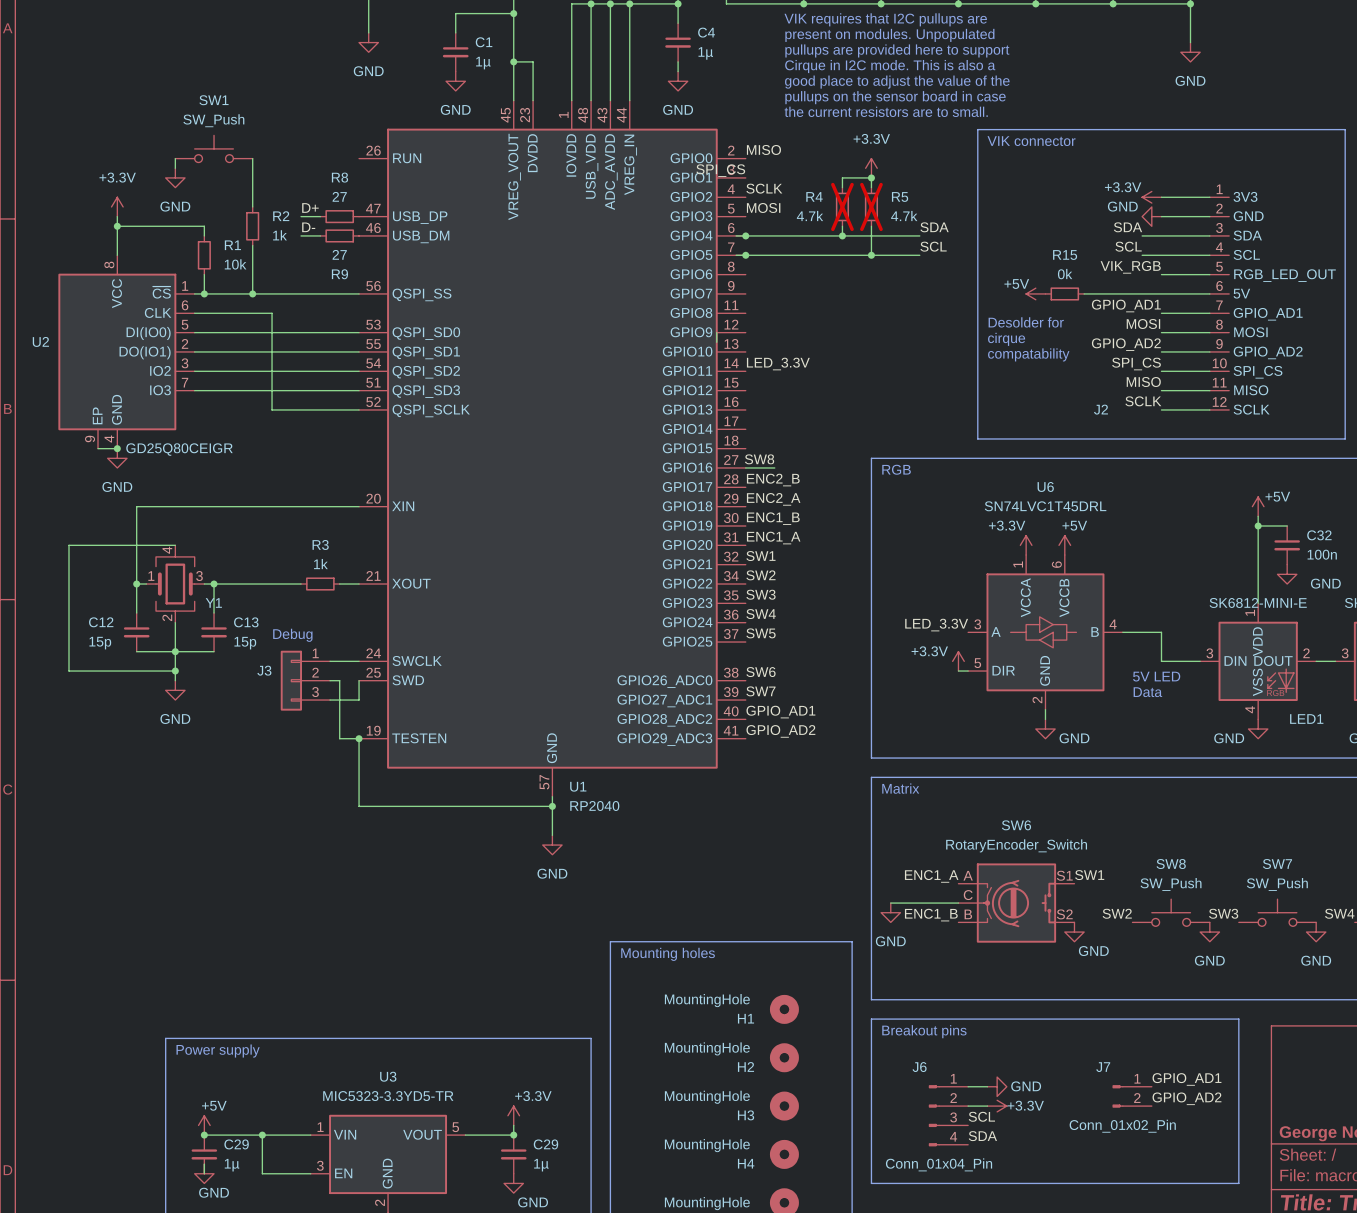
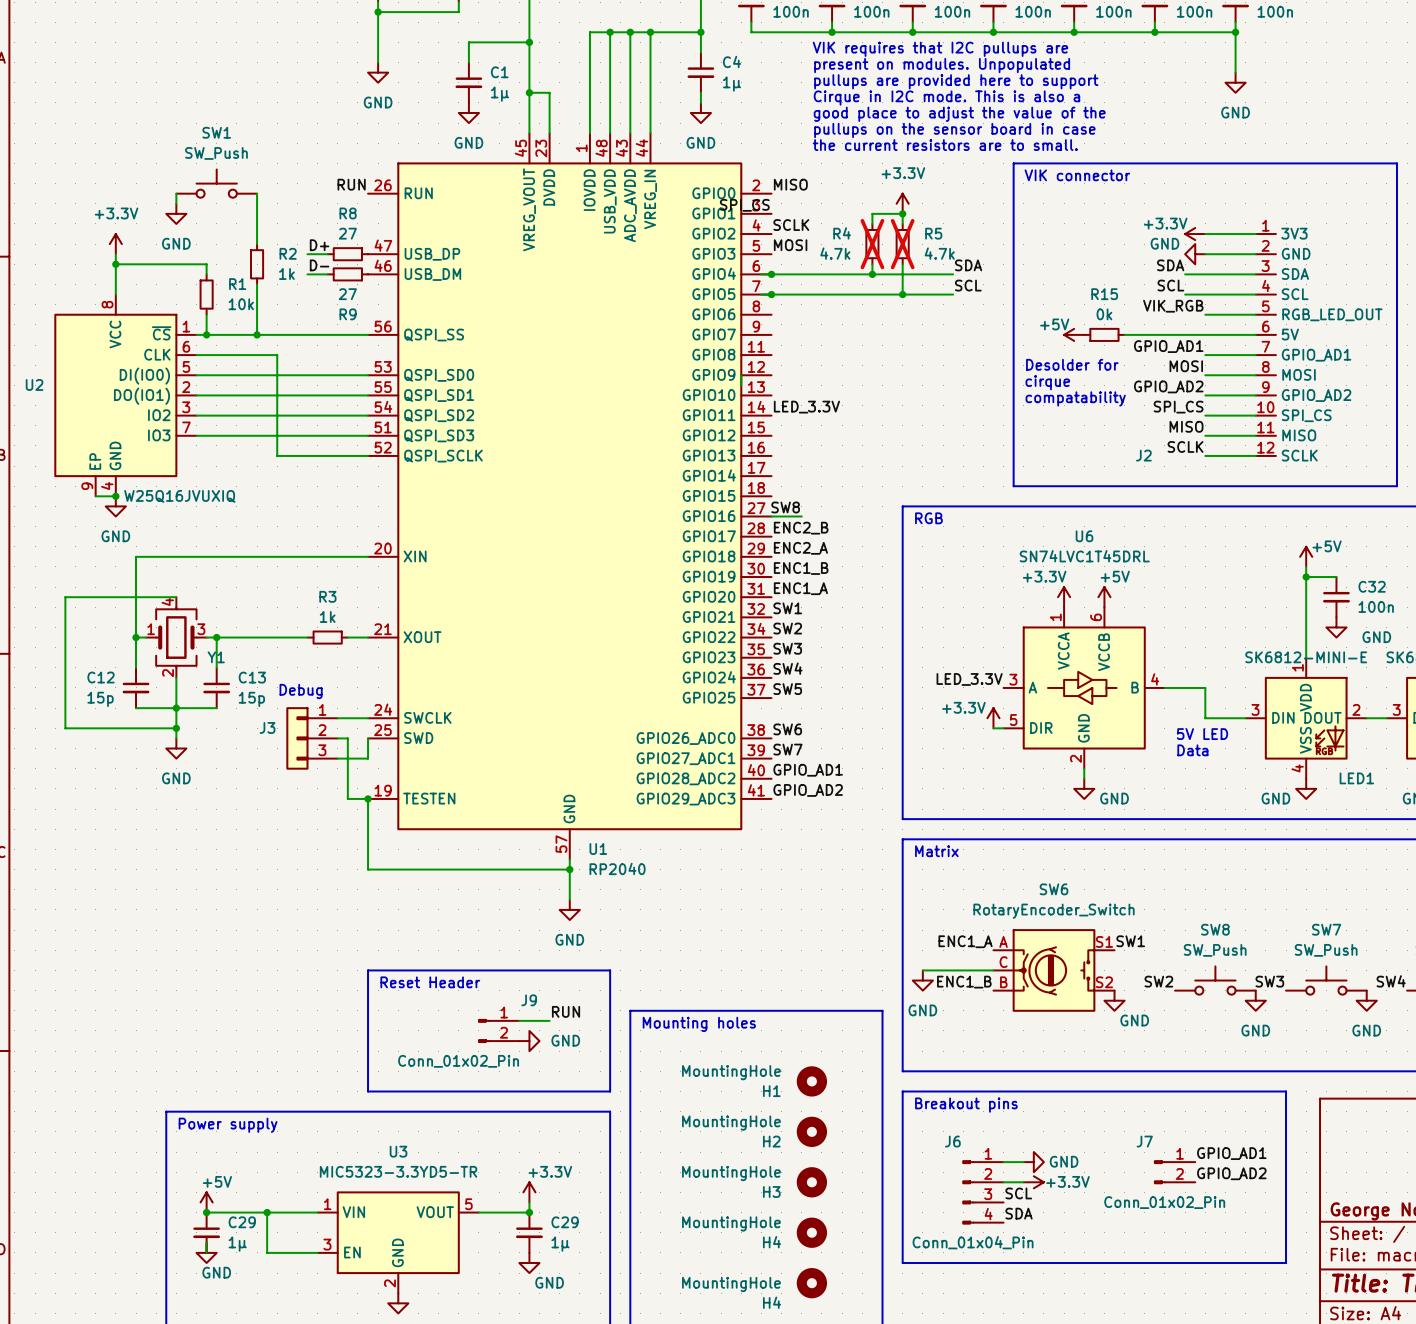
label: none -> RUN (351, 184)
U2 value: GD25Q80CEIGR (179, 449) -> W25Q16JVUXIQ (179, 496)
line: none -> (368, 970) (610, 970) (610, 1091) (368, 1091) (368, 970)
text: none -> Reset Header (430, 982)
label: none -> RUN (566, 1011)
wire: none -> (519, 1020) (549, 1020)
J9: none -> Conn_01x02_Pin (498, 1030)
power symbol: none -> GND (529, 1041)

